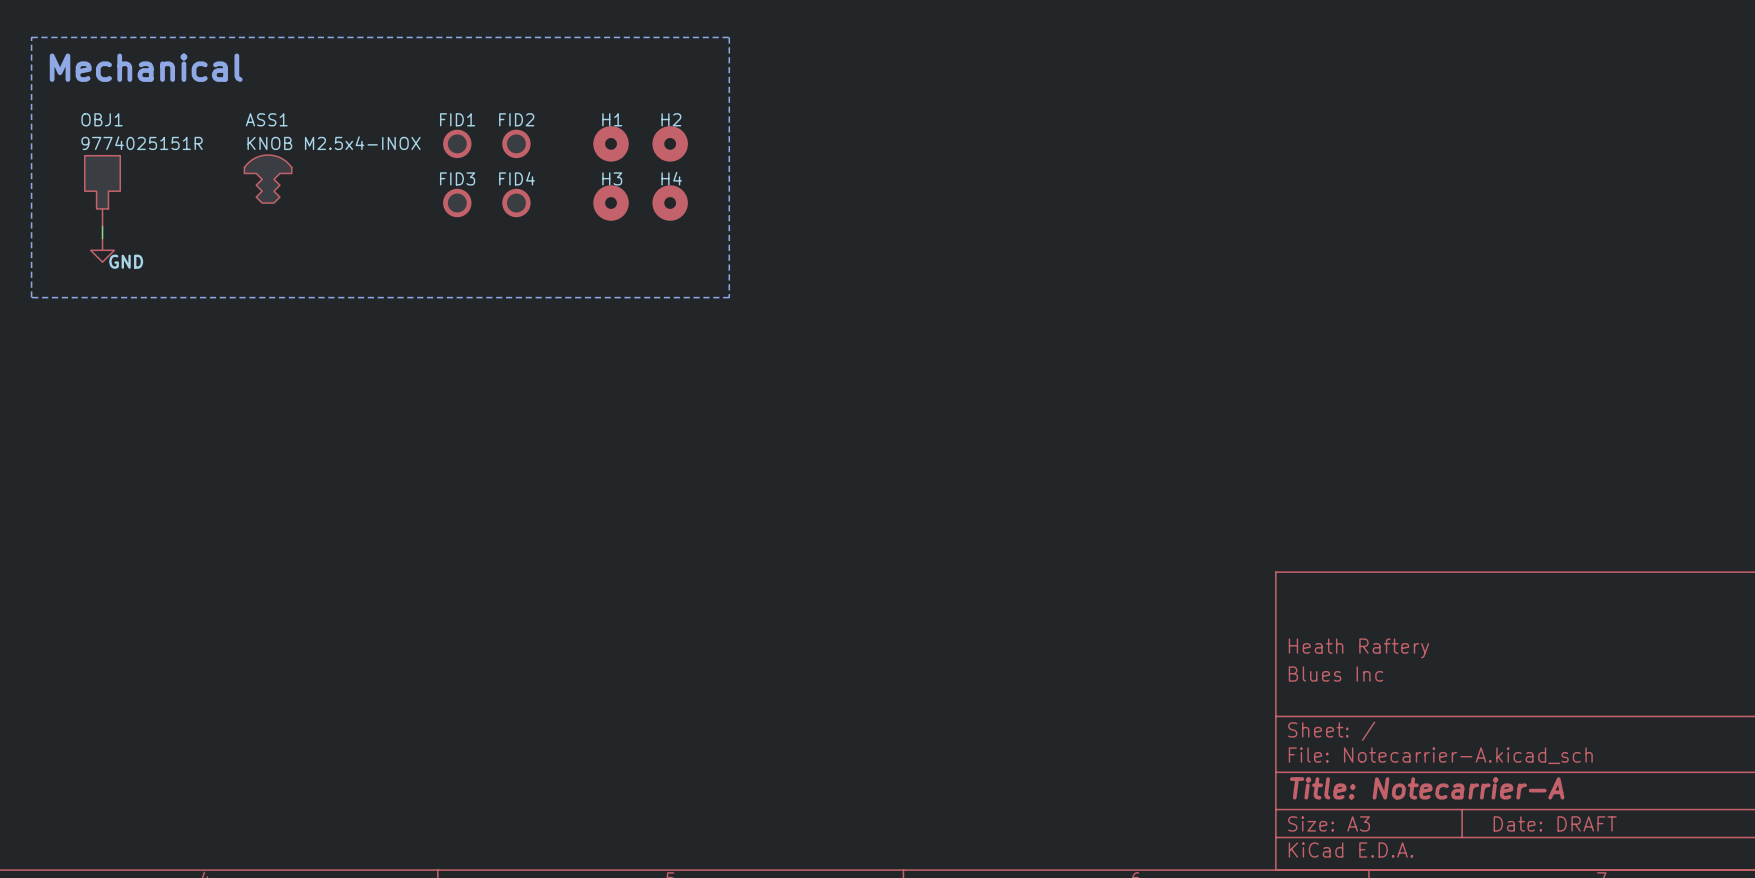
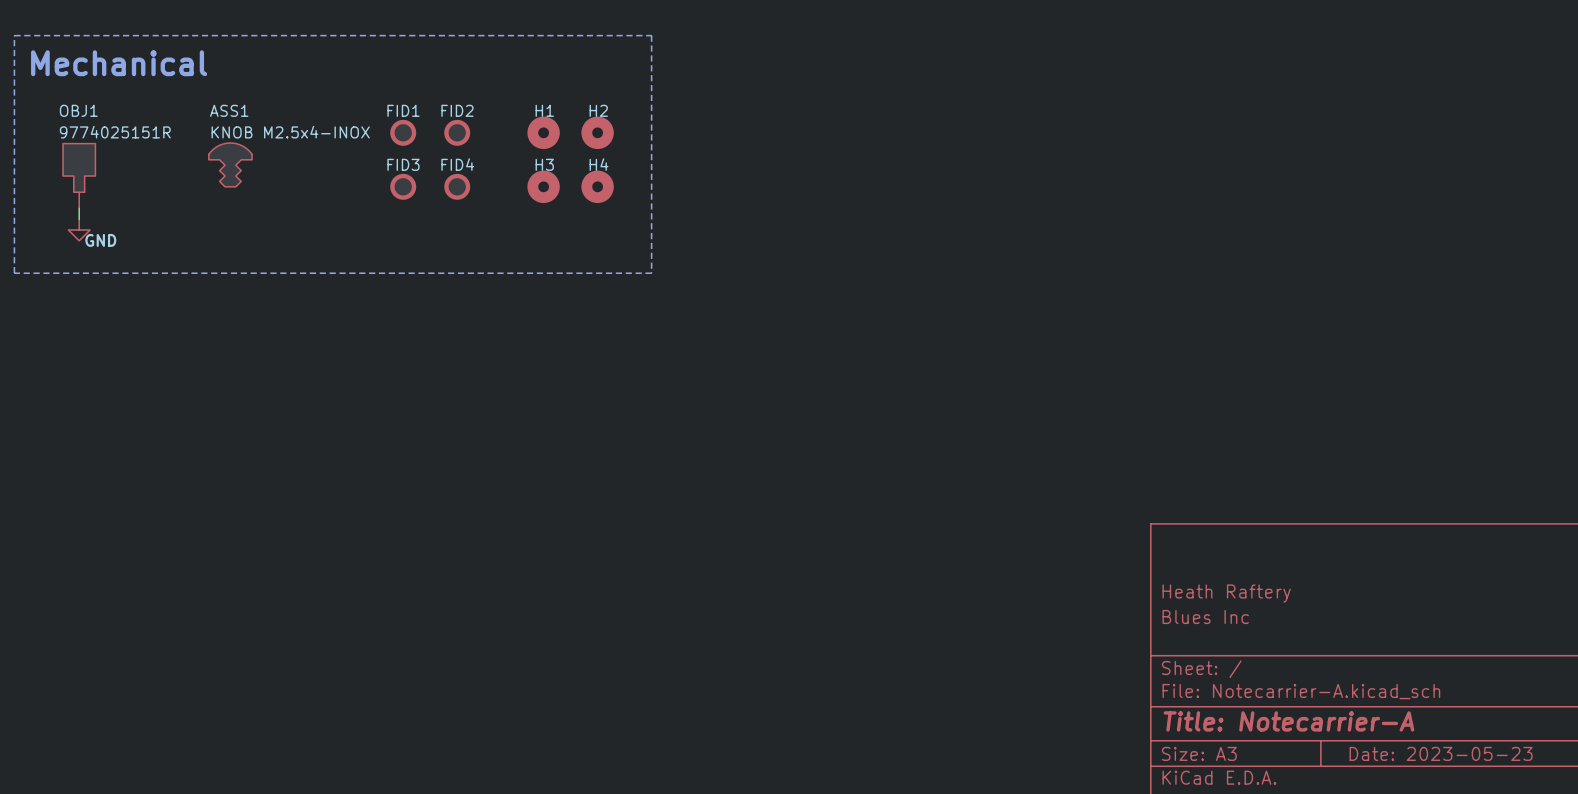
title block: Date: DRAFT (1555, 823) -> Date: 2023-05-23 (1441, 753)

